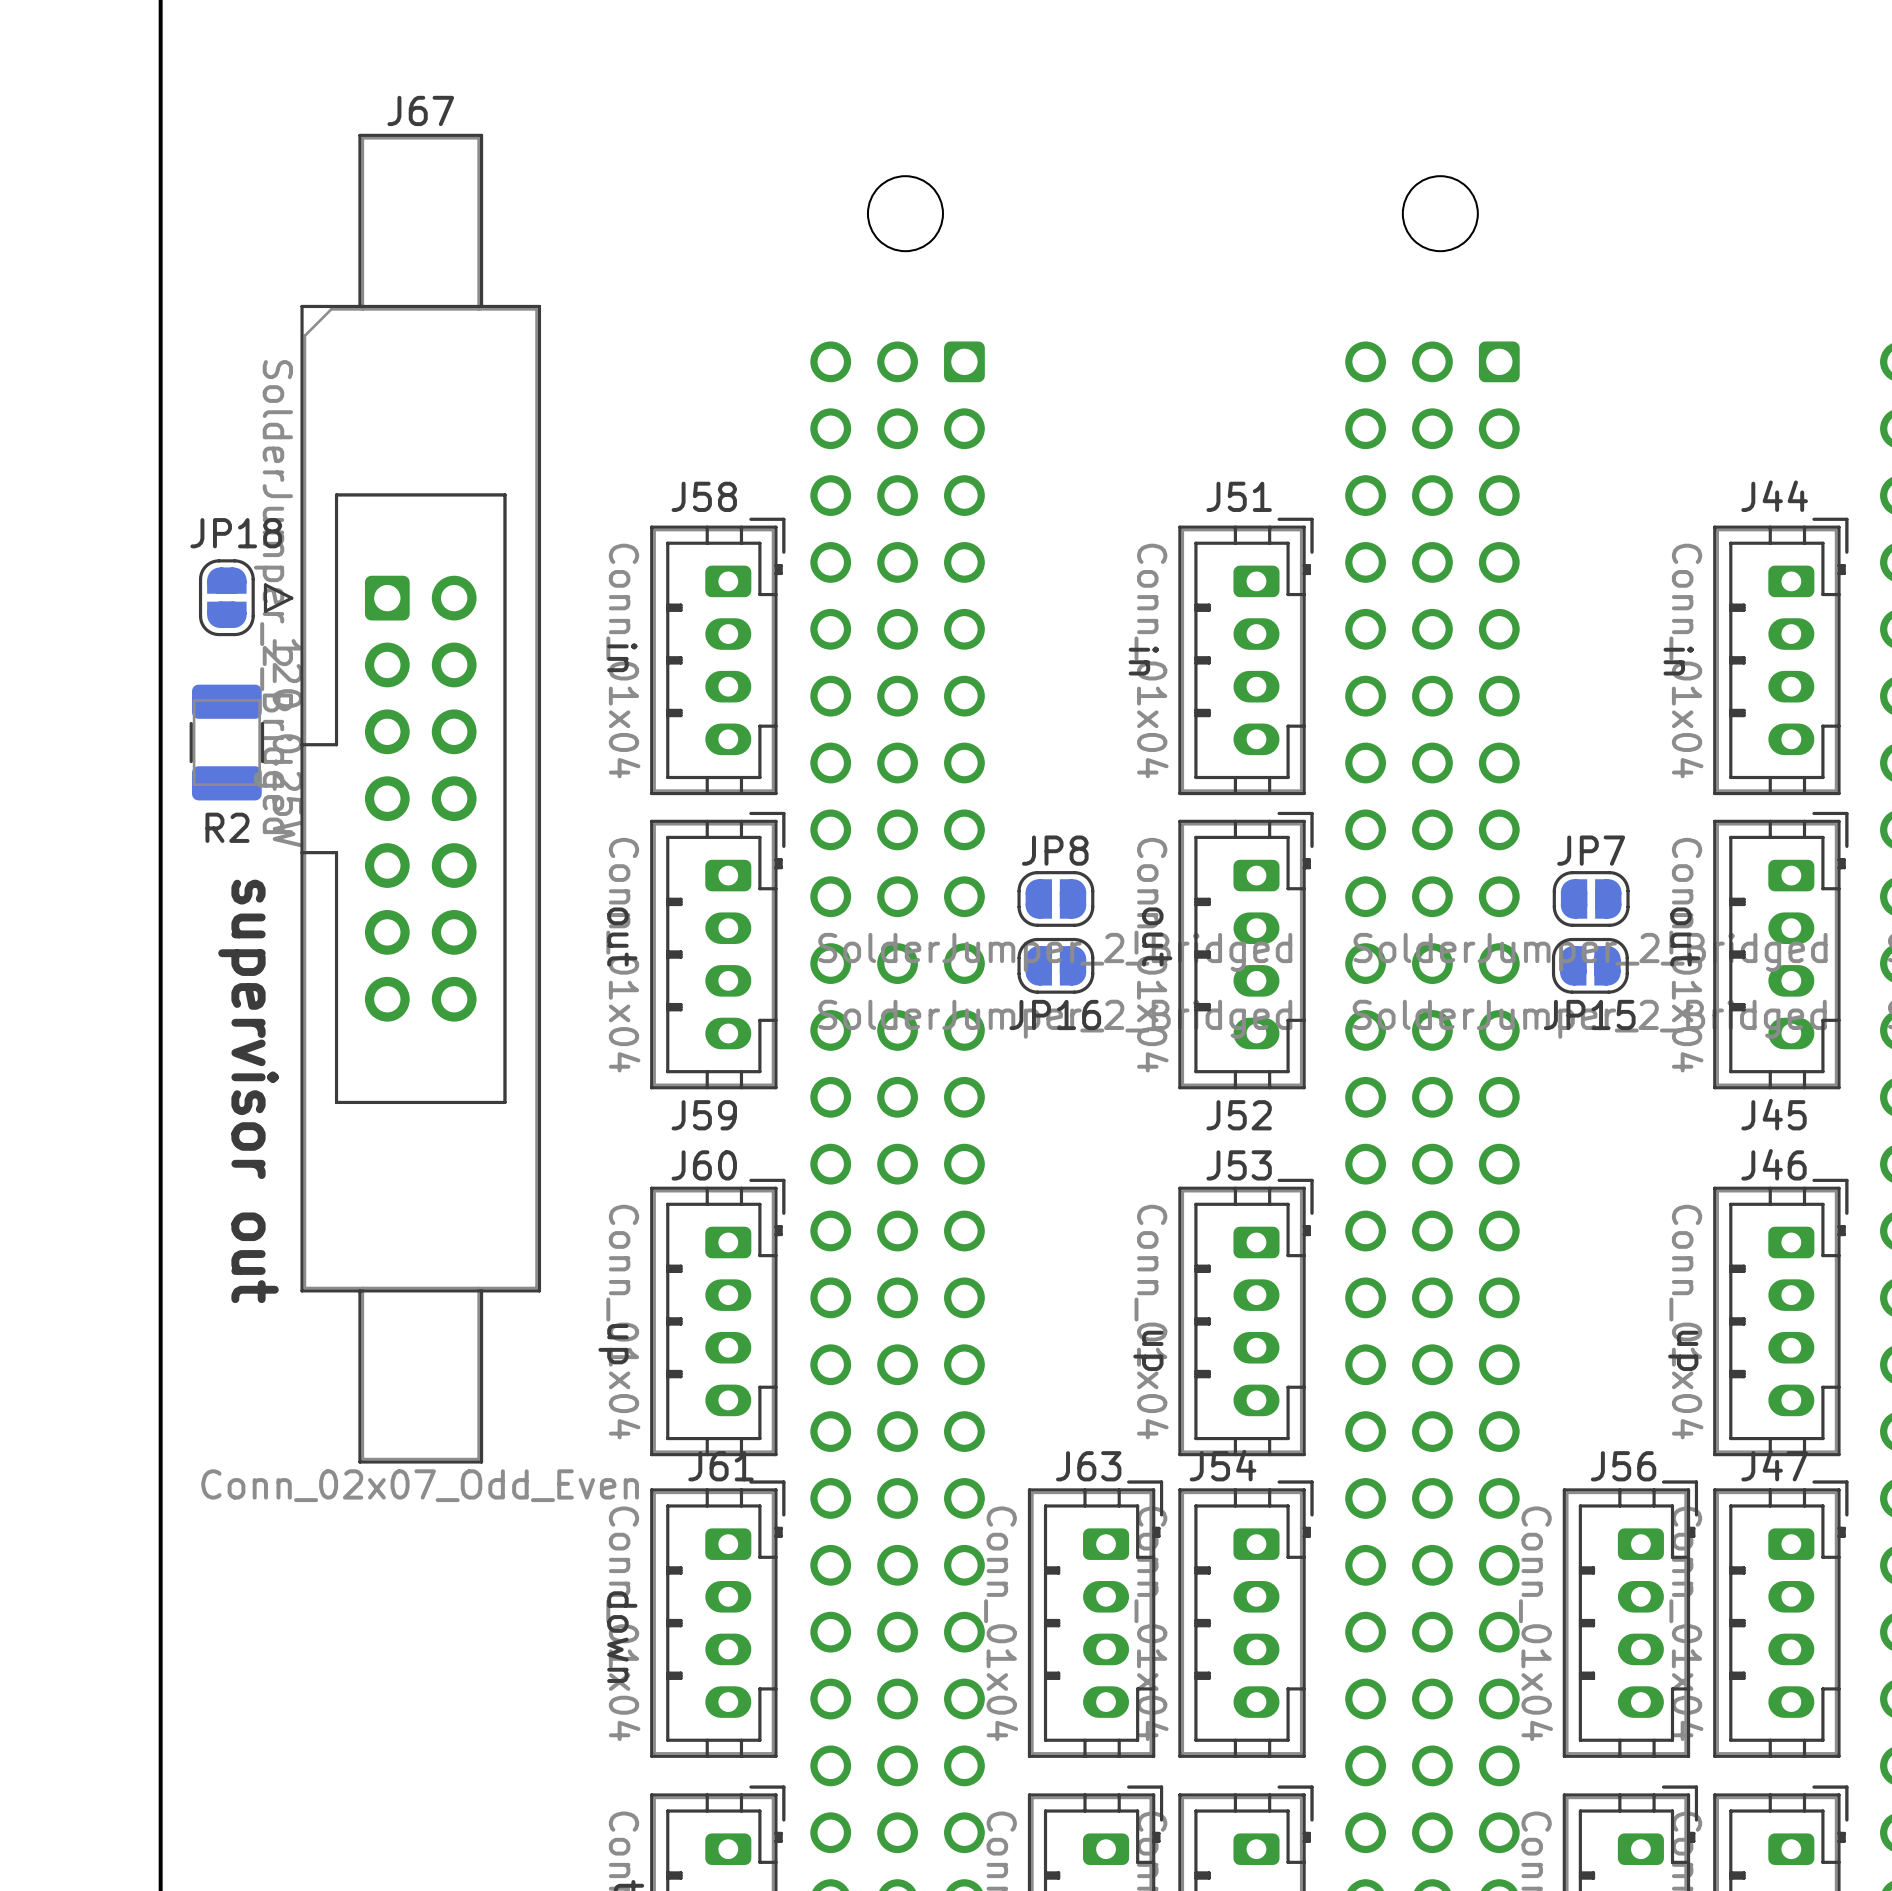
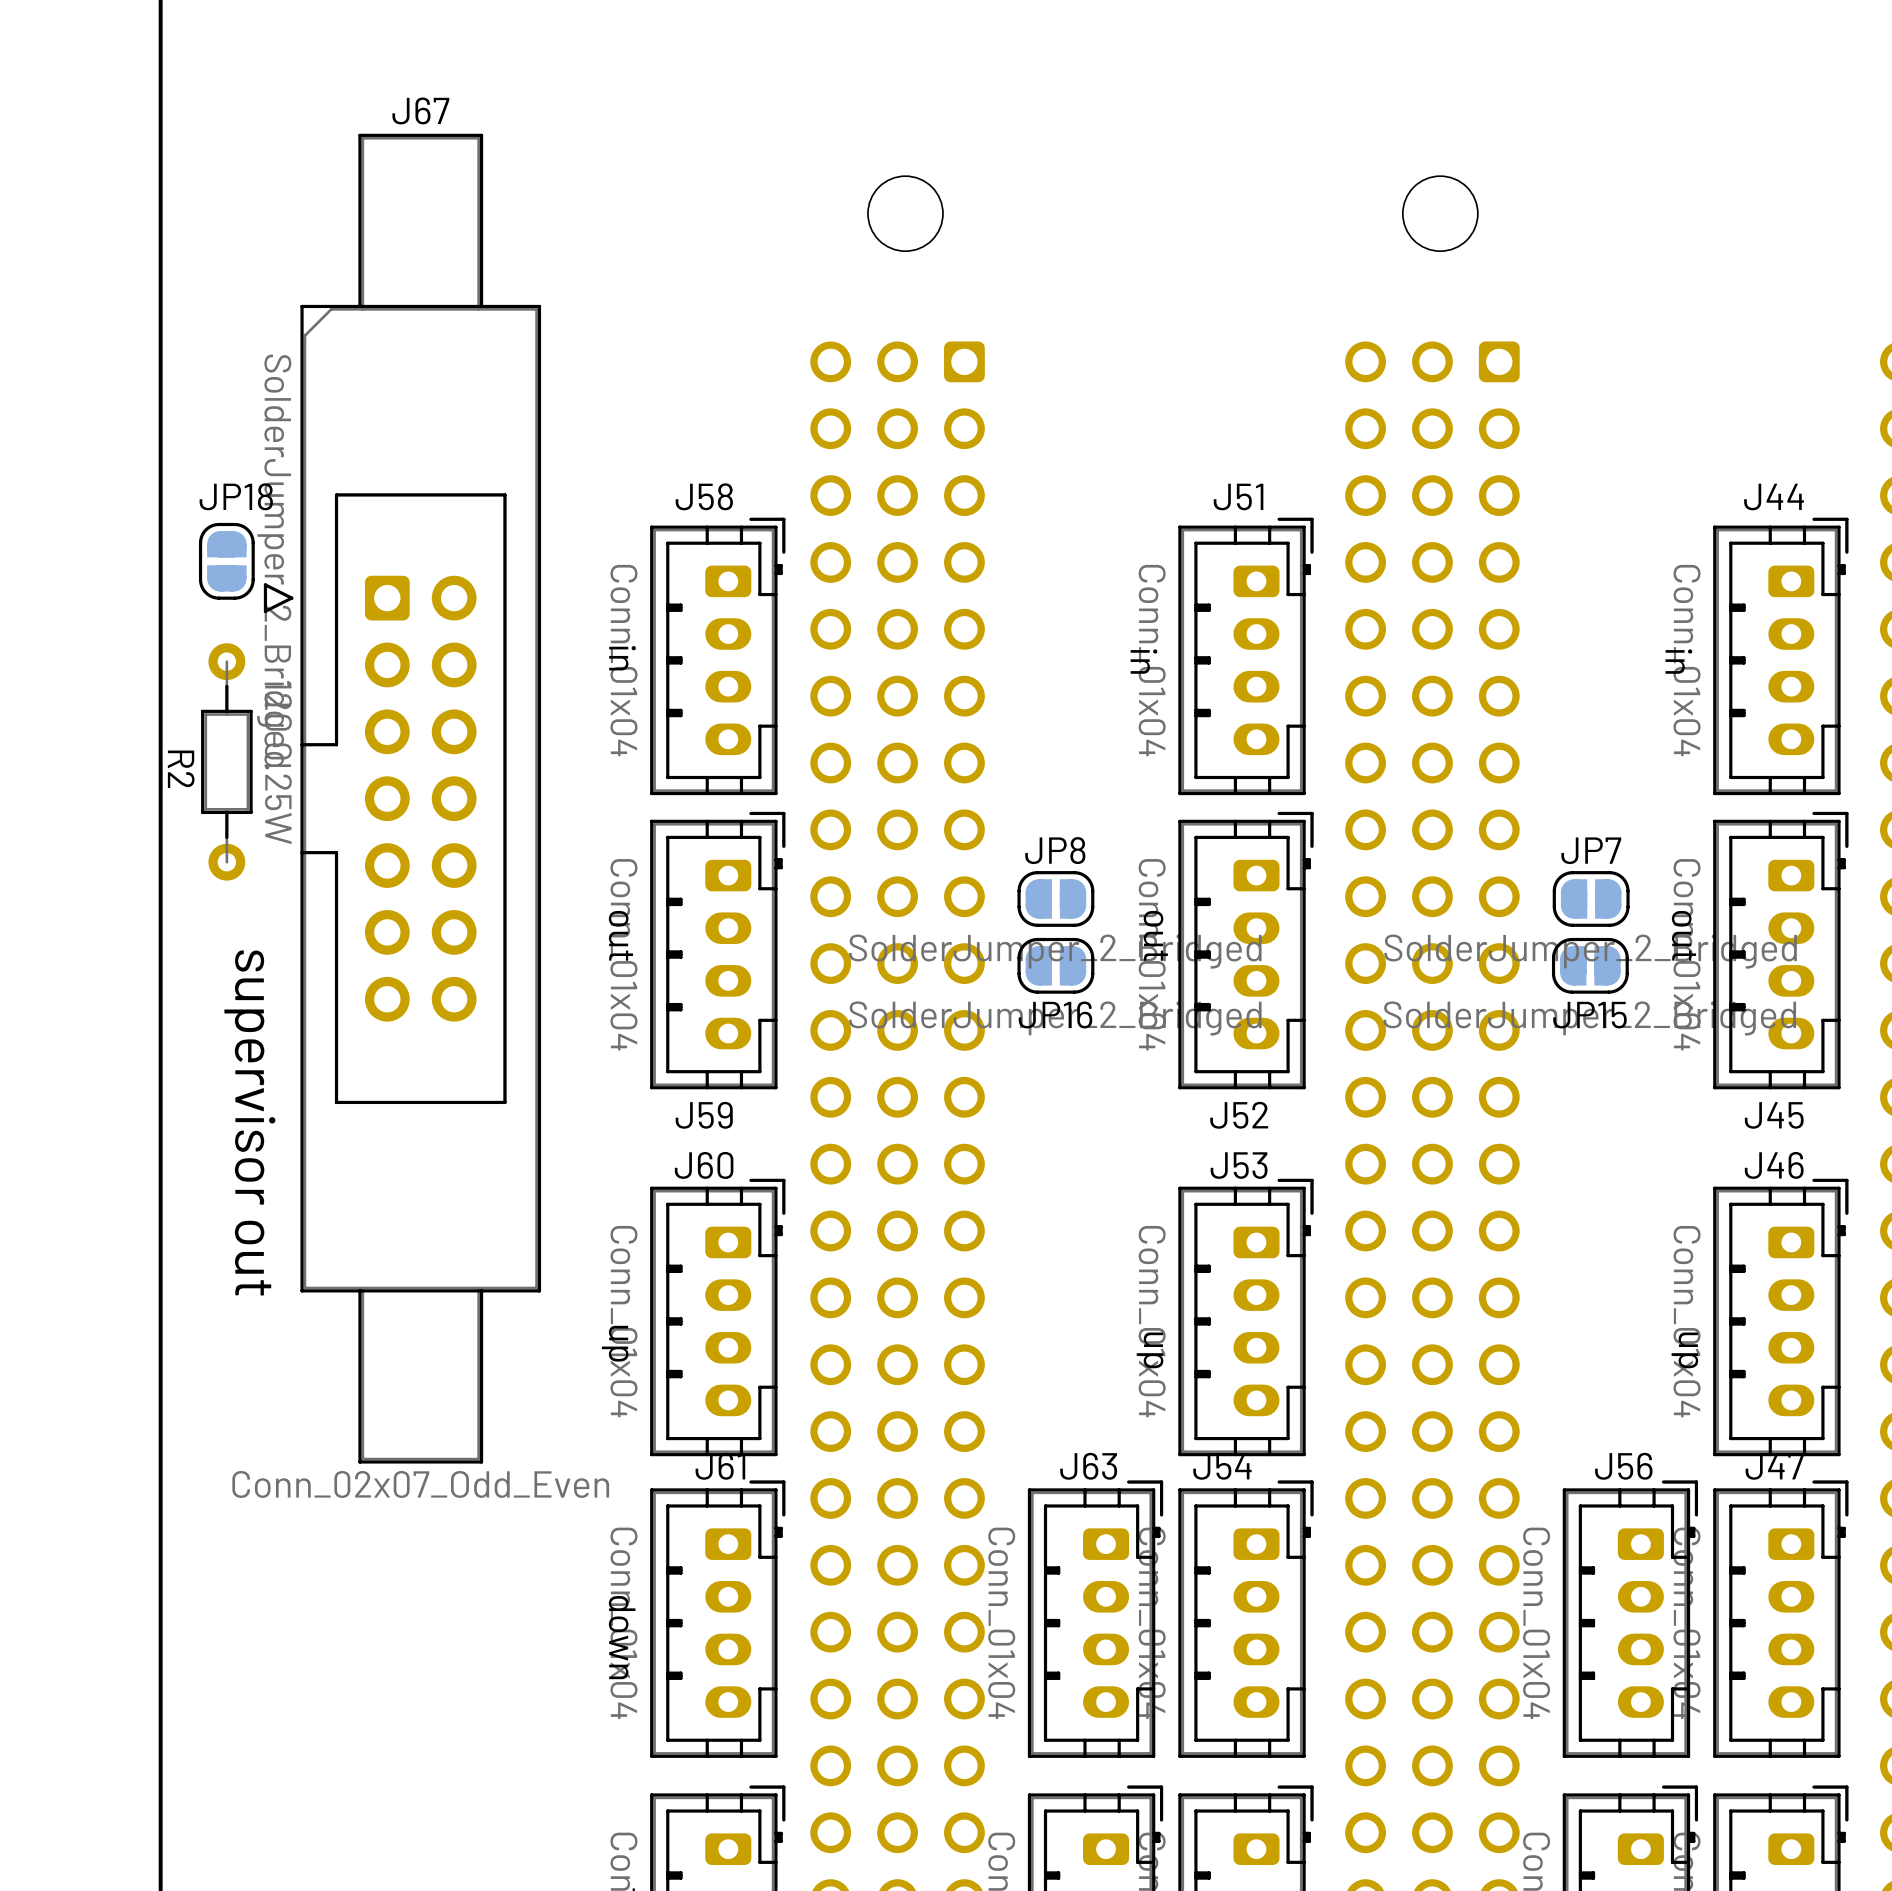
JP18 position: (226, 597) -> (226, 561)
R2 footprint: [189, 684, 265, 801] -> [201, 643, 253, 881]
R2 name position: R2 (227, 827) -> R2 (181, 769)
text position: supervisor out (248, 1091) -> supervisor out (249, 1122)

